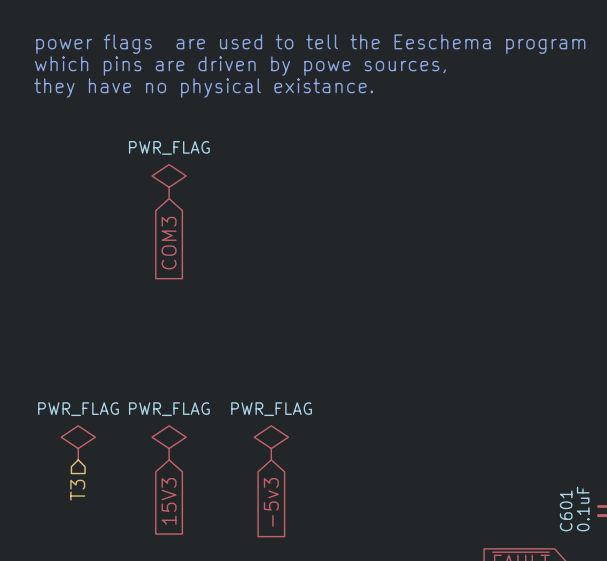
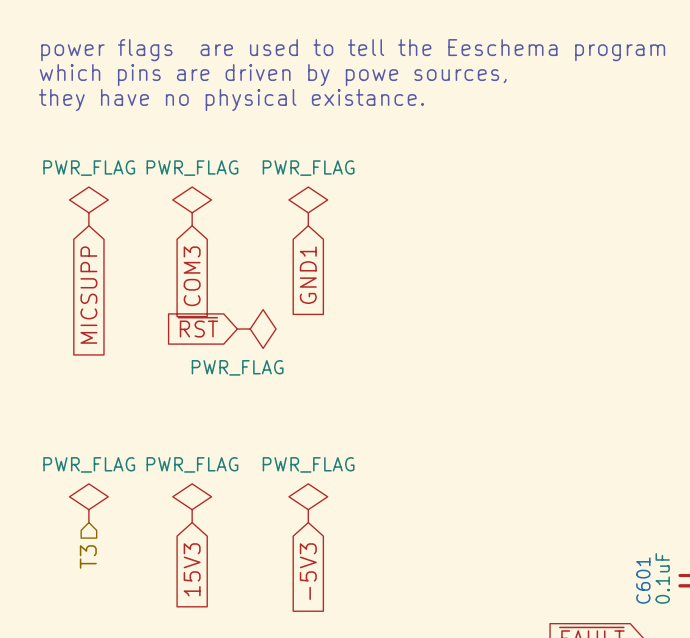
power symbol: none -> PWR_FLAG (88, 206)
power symbol: none -> PWR_FLAG (308, 206)
global label: none -> GND1 (308, 275)
global label: none -> MICSUPP (88, 295)
global label: none -> ~{RST} (197, 327)
power symbol: none -> PWR_FLAG (256, 329)
global label: -5v3 (271, 502) -> -5V3 (308, 571)

